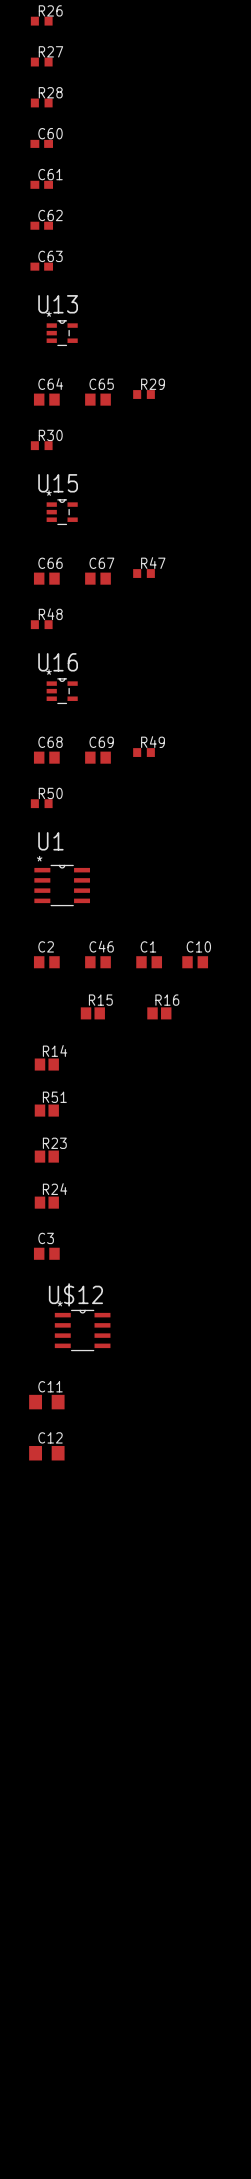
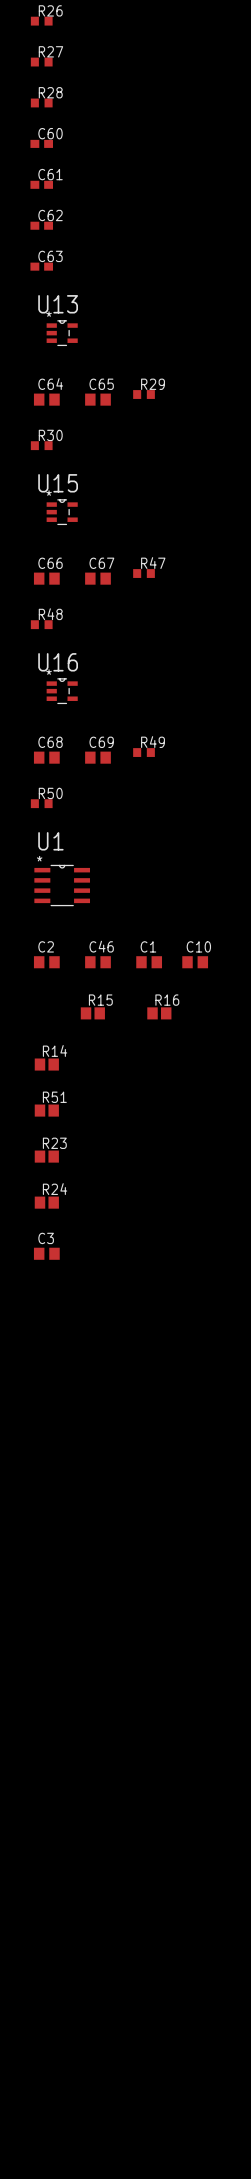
U$12: (82, 1330) -> none
C11: (46, 1402) -> none
C12: (46, 1453) -> none

